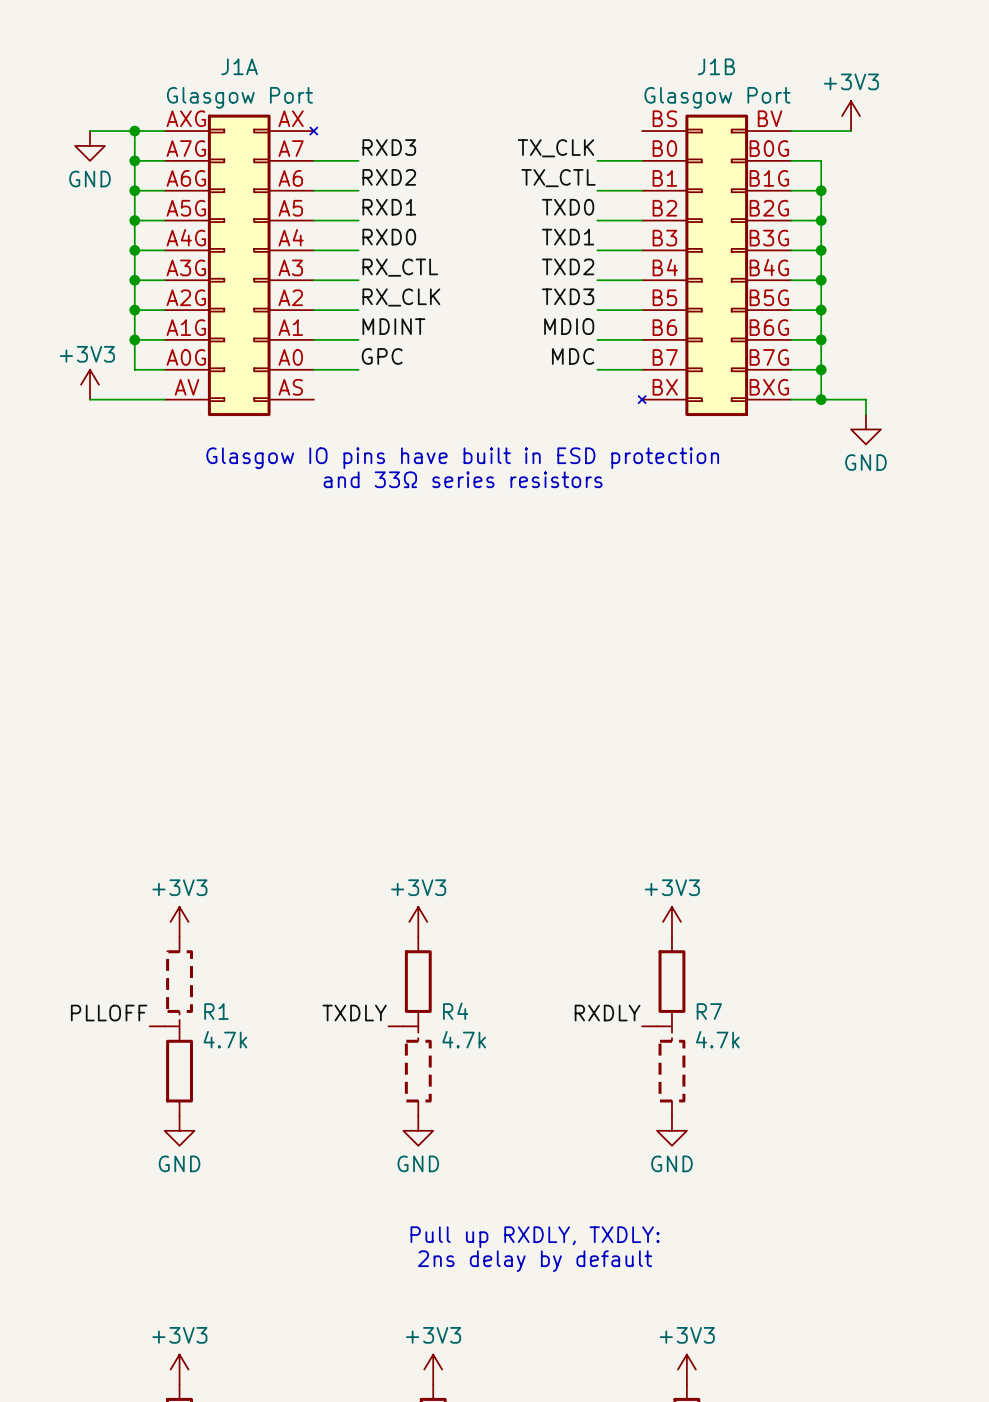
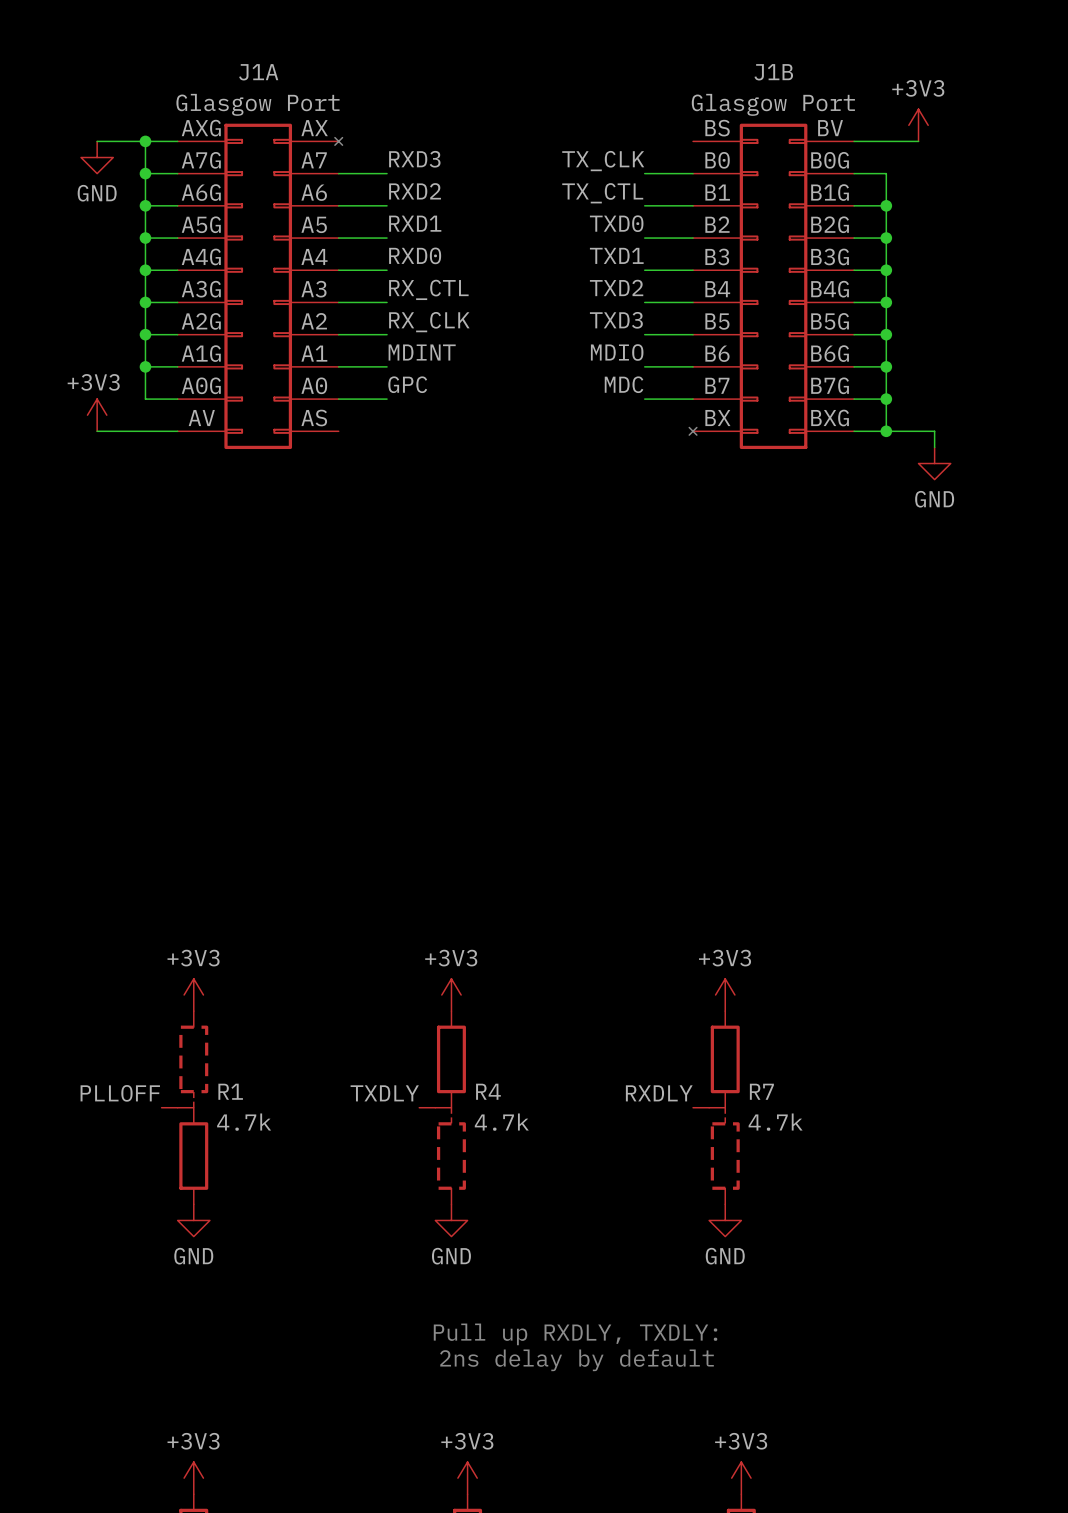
text: Glasgow IO pins have built in ESD protection (462, 458) -> none
text: and 33Ω series resistors (463, 479) -> none

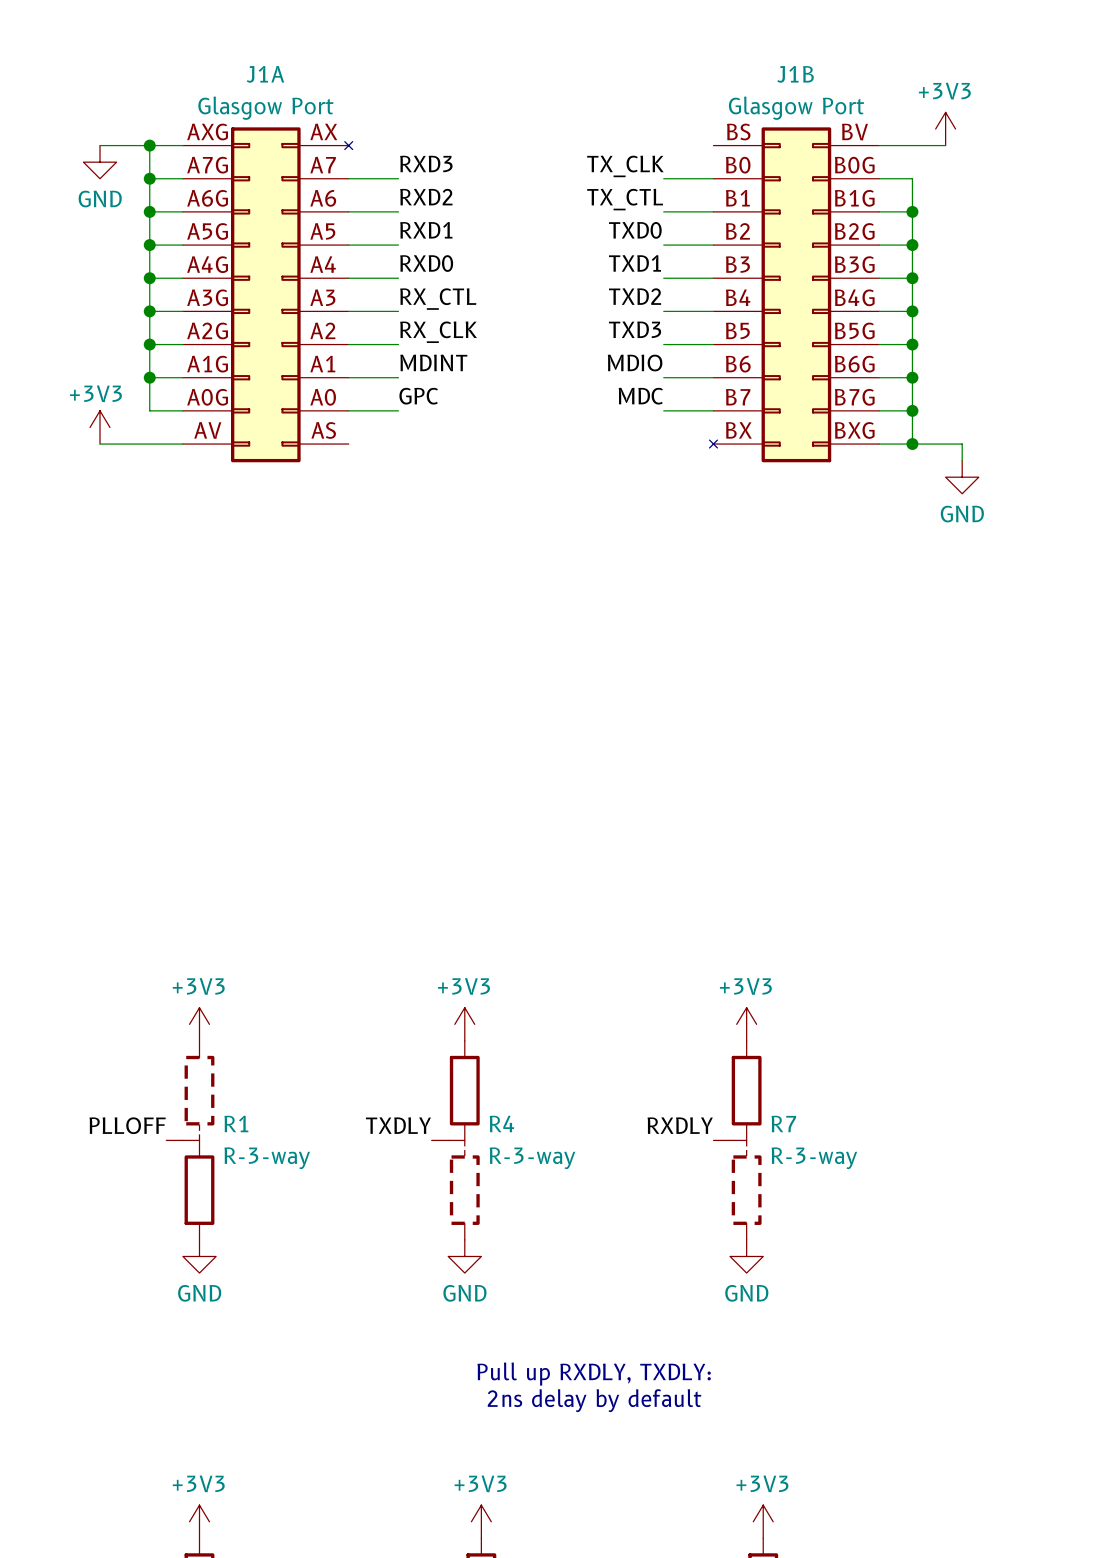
R1 value: 4.7k (244, 1122) -> R-3-way (267, 1158)
R4 value: 4.7k (501, 1122) -> R-3-way (532, 1158)
R7 value: 4.7k (775, 1122) -> R-3-way (814, 1158)

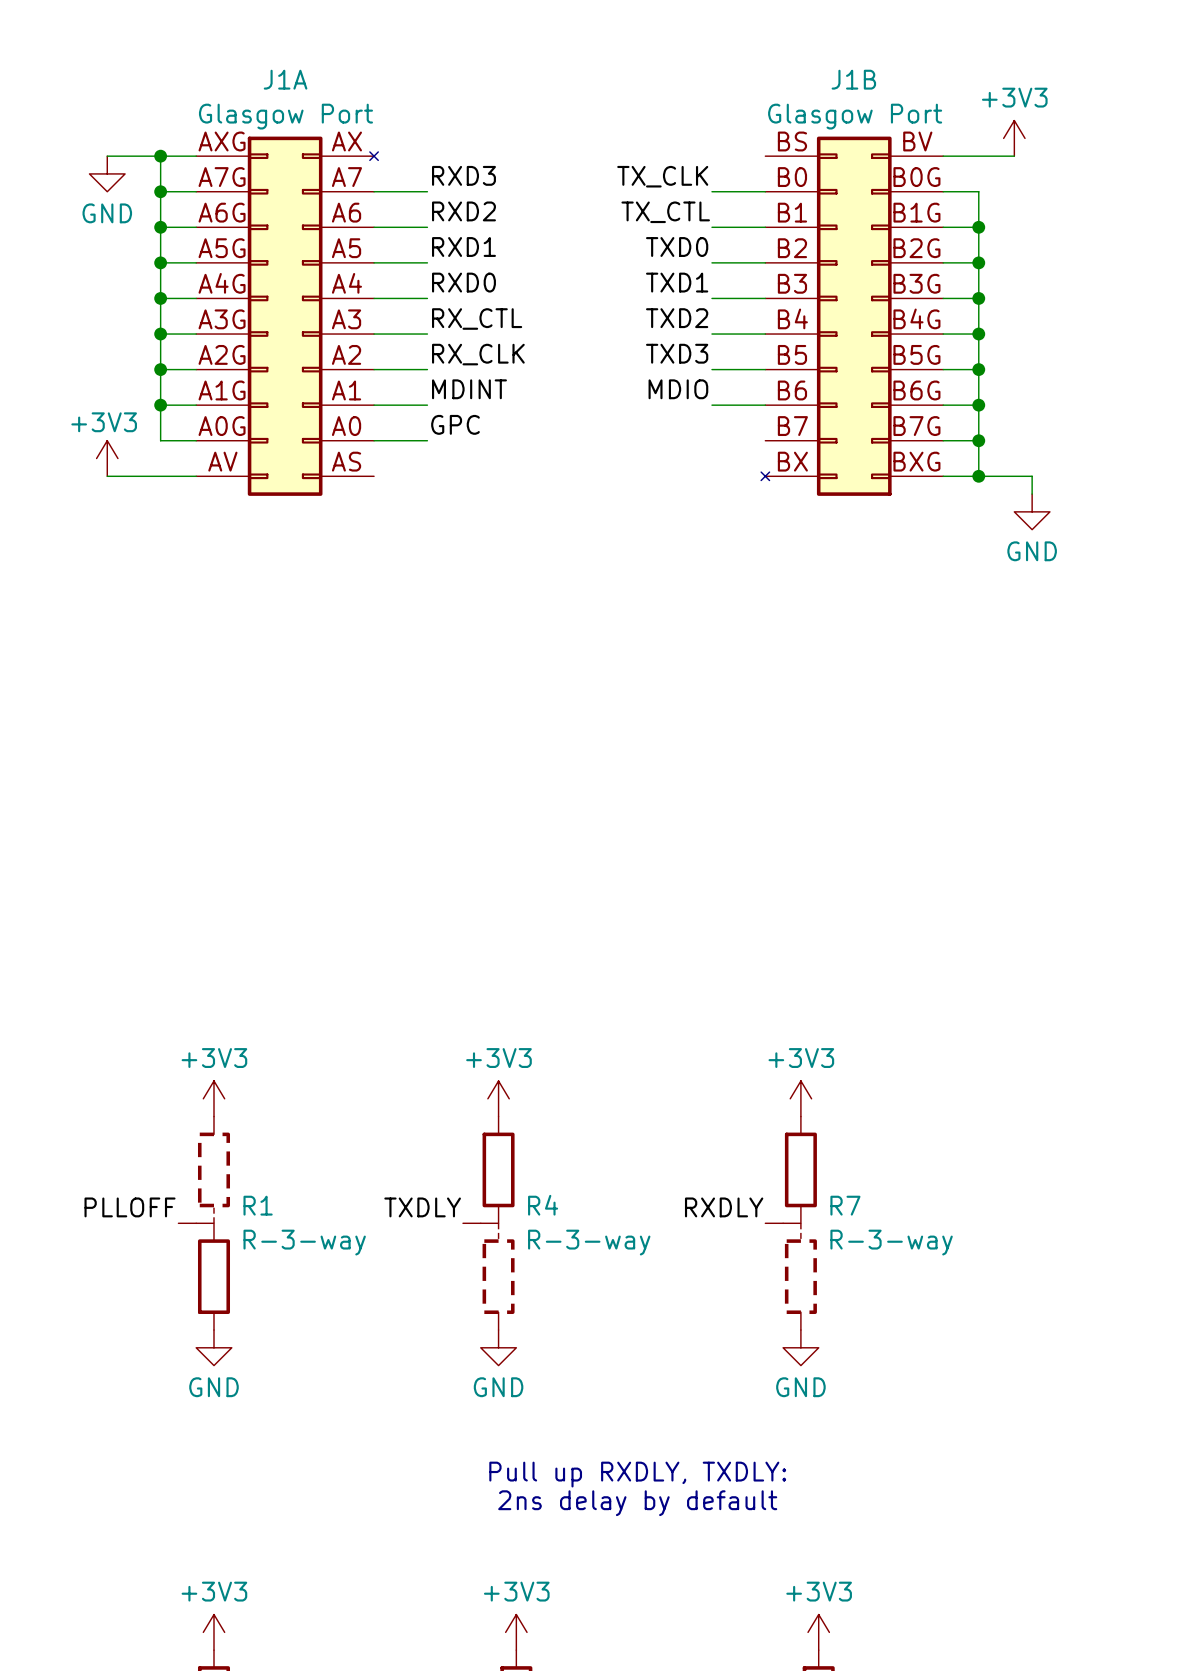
label: MDC (640, 396) -> none
wire: (663, 410) (713, 410) -> none

